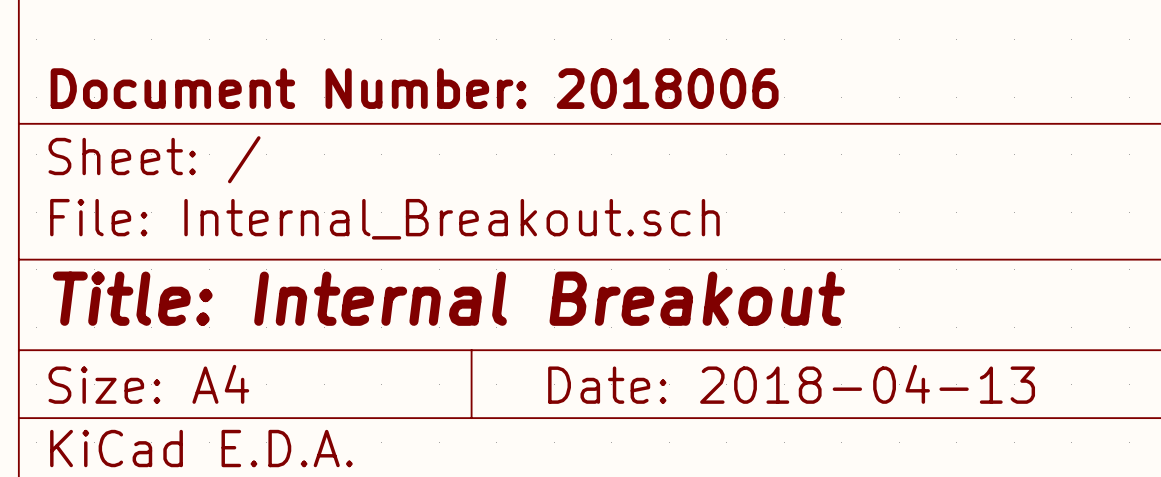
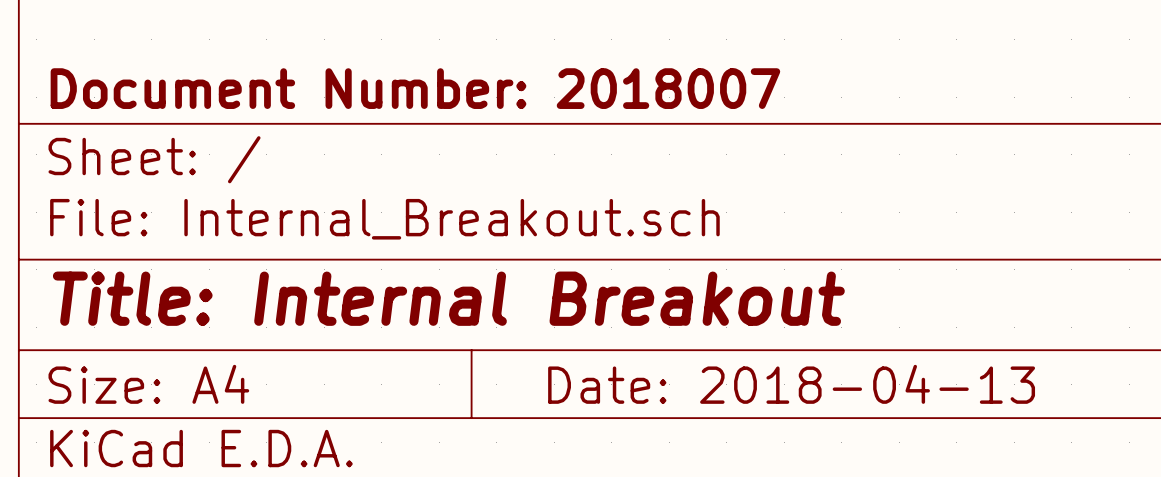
title block: Document Number: 2018006 (414, 88) -> Document Number: 2018007 (415, 88)

